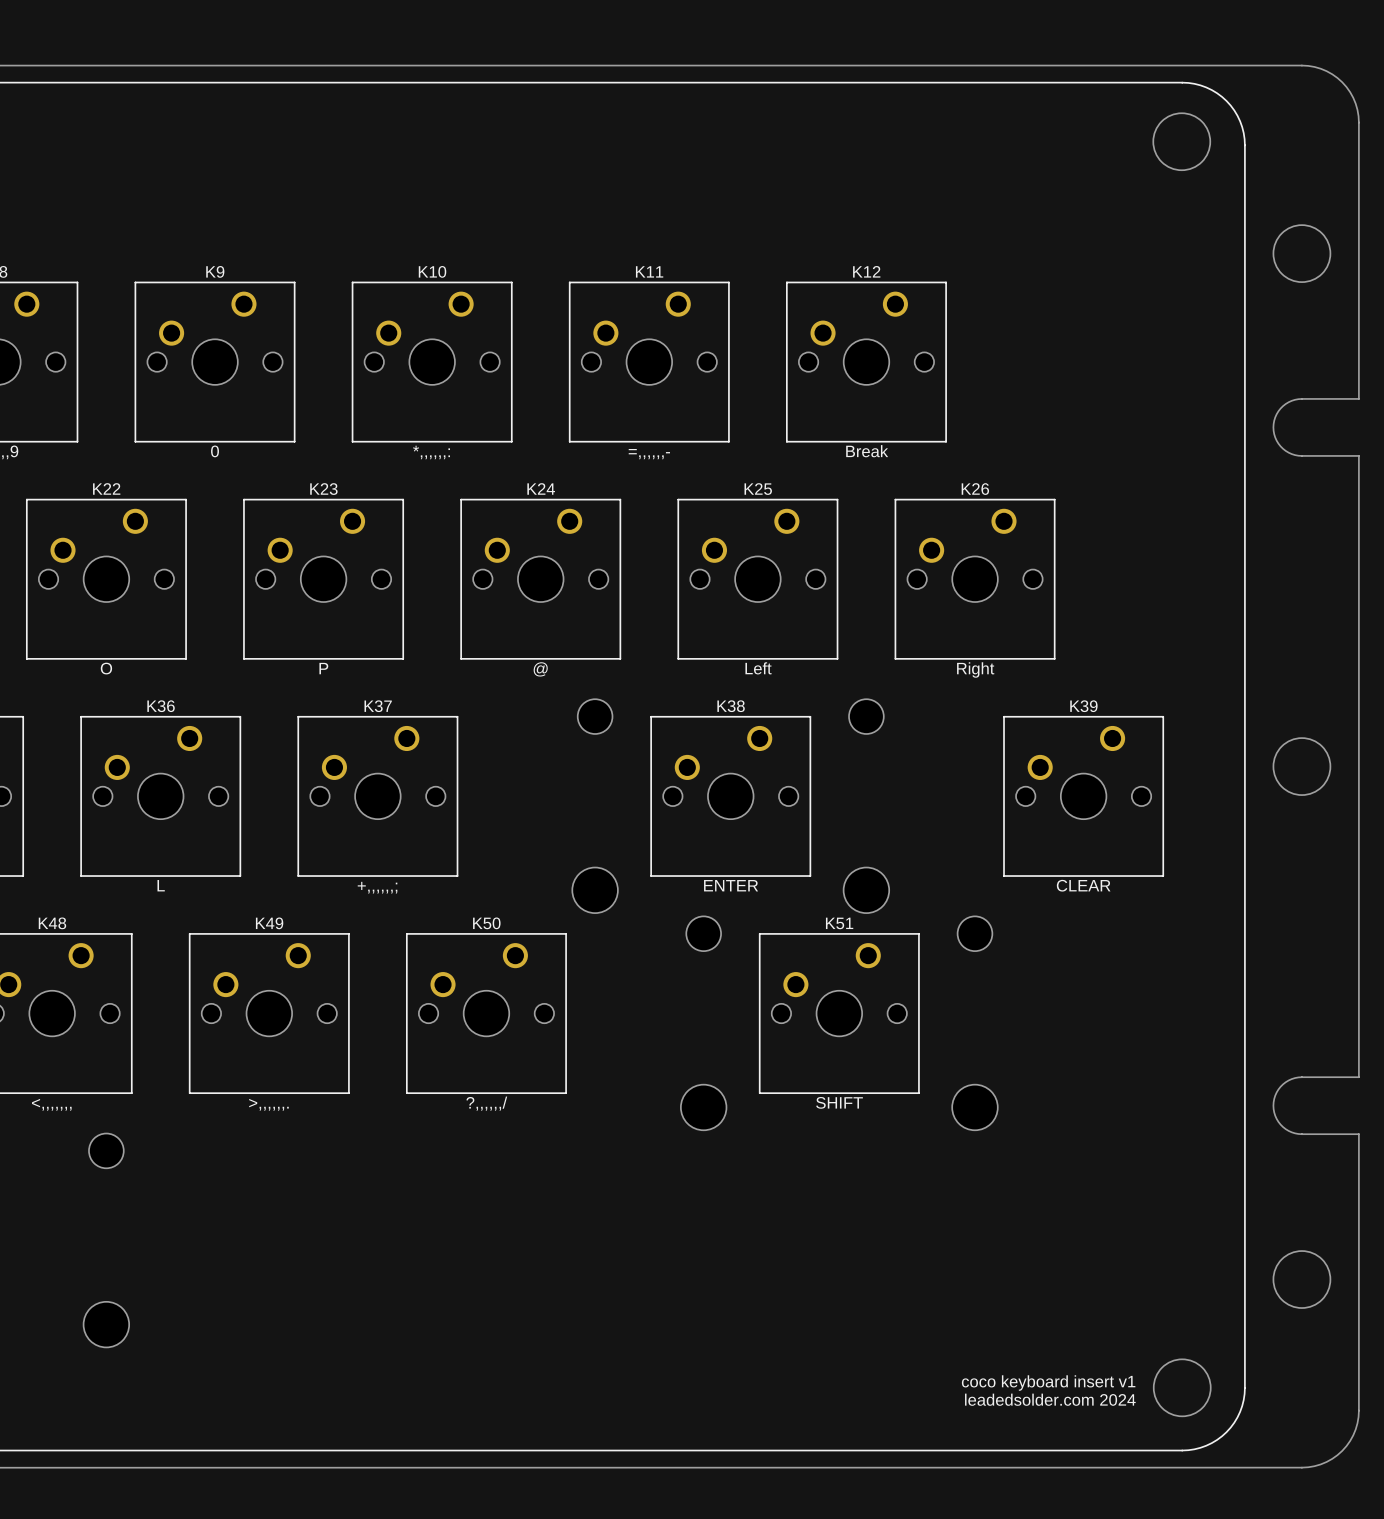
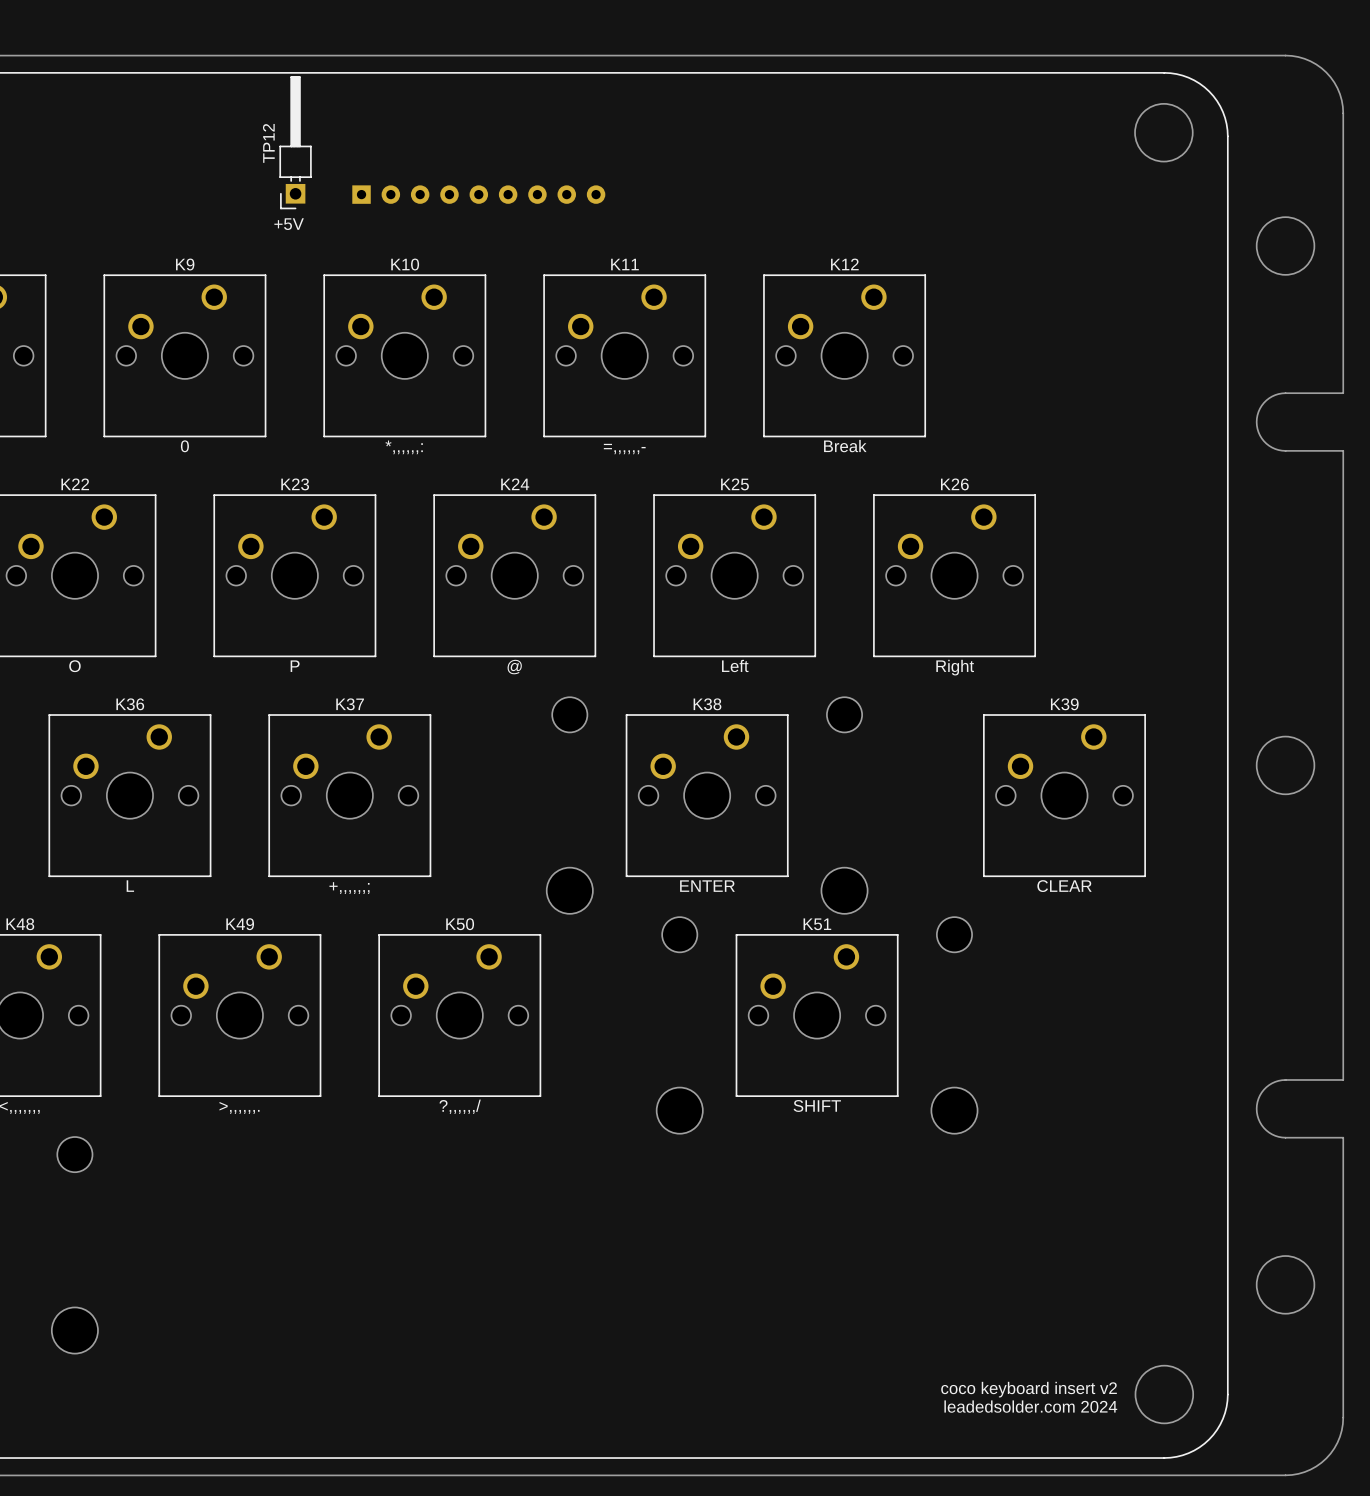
TP12: none -> (295, 142)
part: none -> (478, 194)
text: none -> +5V (289, 224)
text: coco keyboard insert v1 (1048, 1383) -> coco keyboard insert v2 (1029, 1389)

